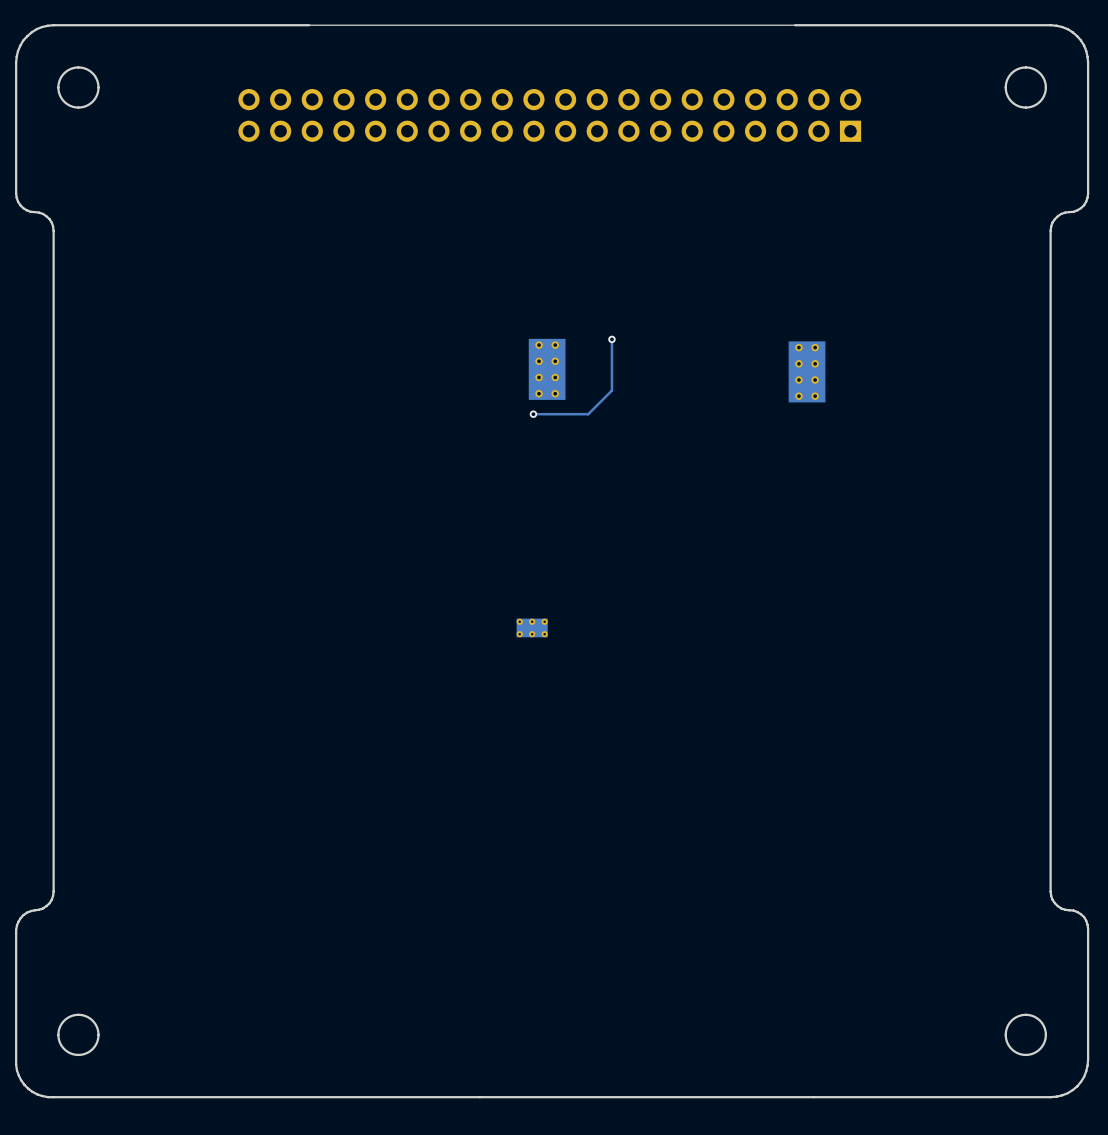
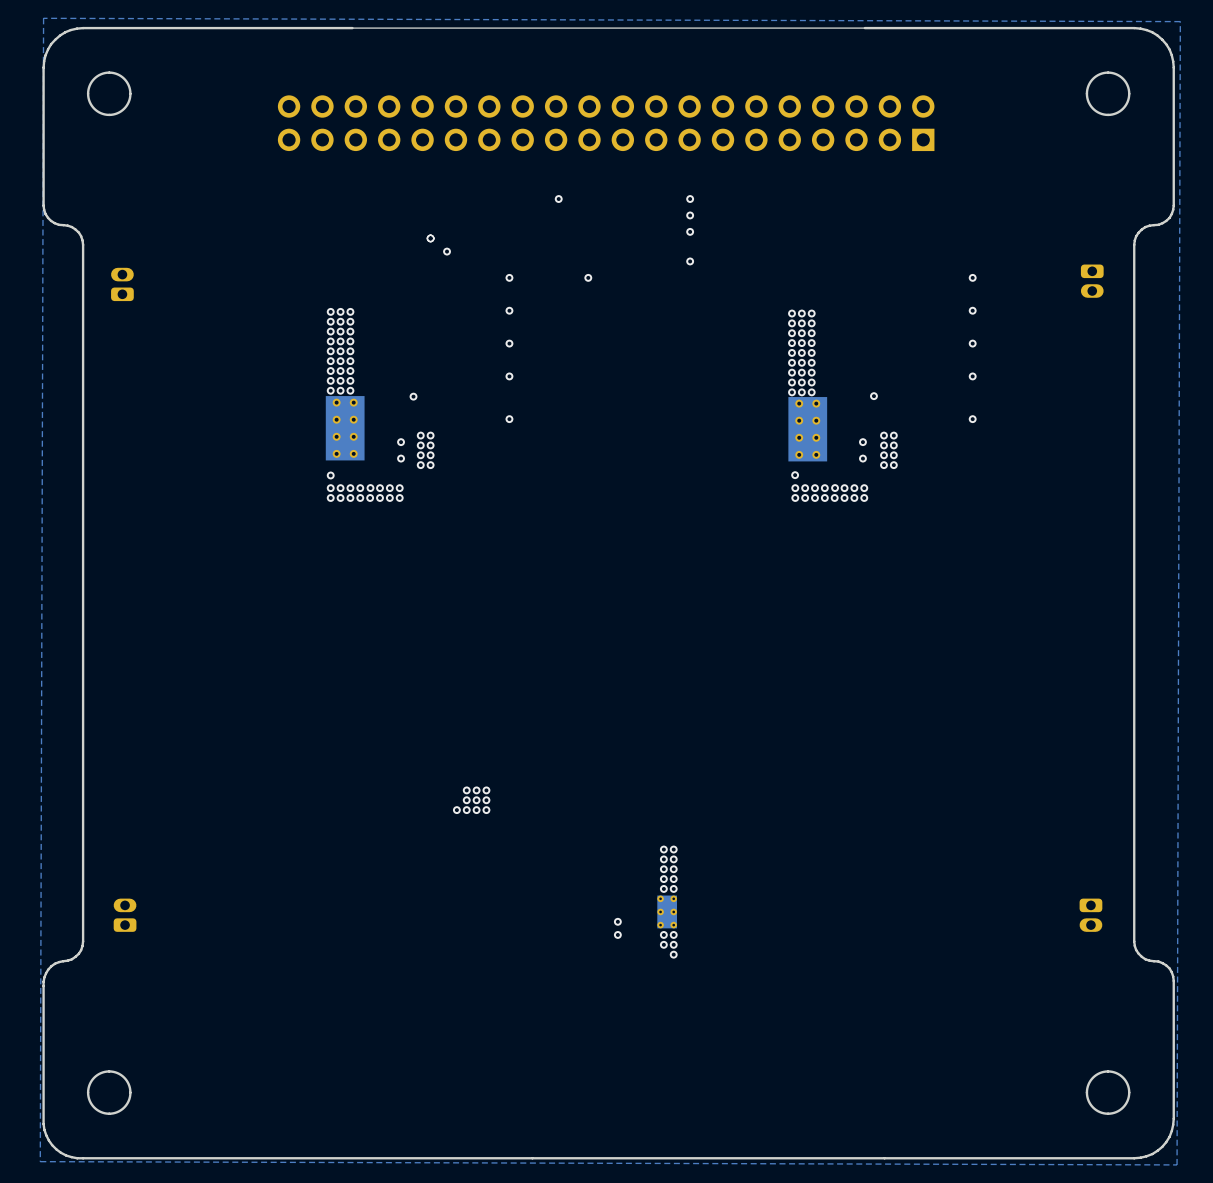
zone outline: none -> (43, 18) (1180, 21) (1177, 1164) (40, 1161) (43, 18)
via: none -> (558, 199)
via: none -> (690, 199)
via: none -> (690, 215)
via: none -> (690, 231)
via: none -> (430, 238)
via: none -> (447, 251)
via: none -> (690, 261)
via: none -> (509, 277)
via: none -> (588, 277)
via: none -> (972, 277)
part: none -> (1092, 281)
part: none -> (122, 284)
via: none -> (509, 310)
via: none -> (972, 310)
via: none -> (330, 311)
via: none -> (340, 311)
via: none -> (350, 311)
via: none -> (791, 313)
via: none -> (801, 313)
via: none -> (811, 313)
via: none -> (330, 321)
via: none -> (340, 321)
via: none -> (350, 321)
via: none -> (791, 323)
via: none -> (801, 323)
via: none -> (811, 323)
via: none -> (330, 331)
via: none -> (340, 331)
via: none -> (350, 331)
via: none -> (791, 333)
via: none -> (801, 333)
via: none -> (811, 333)
via: none -> (330, 341)
via: none -> (340, 341)
via: none -> (350, 341)
via: none -> (791, 343)
via: none -> (801, 343)
via: none -> (811, 343)
via: none -> (509, 343)
via: none -> (972, 343)
via: none -> (330, 351)
via: none -> (340, 351)
via: none -> (350, 351)
via: none -> (791, 352)
via: none -> (801, 352)
via: none -> (811, 352)
track: (611, 339) (611, 390) (588, 414) (533, 414) -> none
via: (611, 339) -> none
via: none -> (330, 361)
via: none -> (340, 361)
via: none -> (350, 361)
via: none -> (791, 362)
via: none -> (801, 362)
via: none -> (811, 362)
via: none -> (330, 371)
via: none -> (340, 371)
via: none -> (350, 371)
via: none -> (791, 372)
via: none -> (801, 372)
via: none -> (811, 372)
via: none -> (509, 376)
via: none -> (972, 376)
via: none -> (330, 380)
via: none -> (340, 380)
via: none -> (350, 380)
via: none -> (791, 382)
via: none -> (801, 382)
via: none -> (811, 382)
via: none -> (330, 390)
via: none -> (340, 390)
via: none -> (350, 390)
part: (547, 369) -> none
via: none -> (791, 392)
via: none -> (801, 392)
via: none -> (811, 392)
part position: (807, 371) -> (807, 429)
via: none -> (413, 396)
via: none -> (873, 396)
via: none -> (509, 419)
via: none -> (972, 419)
part: none -> (345, 428)
via: none -> (420, 435)
via: none -> (430, 435)
via: none -> (883, 435)
via: none -> (893, 435)
via: (533, 414) -> none
via: none -> (401, 442)
via: none -> (862, 442)
via: none -> (420, 445)
via: none -> (430, 445)
via: none -> (883, 445)
via: none -> (893, 445)
via: none -> (420, 455)
via: none -> (430, 455)
via: none -> (883, 455)
via: none -> (893, 455)
via: none -> (401, 458)
via: none -> (862, 458)
via: none -> (420, 465)
via: none -> (430, 465)
via: none -> (883, 465)
via: none -> (893, 465)
via: none -> (330, 475)
via: none -> (795, 475)
via: none -> (330, 488)
via: none -> (340, 488)
via: none -> (350, 488)
via: none -> (360, 488)
via: none -> (370, 488)
via: none -> (380, 488)
via: none -> (389, 488)
via: none -> (399, 488)
via: none -> (795, 488)
via: none -> (805, 488)
via: none -> (814, 488)
via: none -> (824, 488)
via: none -> (835, 488)
via: none -> (844, 488)
via: none -> (854, 488)
via: none -> (864, 488)
via: none -> (330, 497)
via: none -> (340, 497)
via: none -> (350, 497)
via: none -> (360, 497)
via: none -> (370, 497)
via: none -> (380, 497)
via: none -> (389, 497)
via: none -> (399, 497)
via: none -> (795, 497)
via: none -> (805, 497)
via: none -> (814, 497)
via: none -> (824, 497)
via: none -> (834, 497)
via: none -> (844, 497)
via: none -> (854, 497)
via: none -> (864, 497)
part rotation: 0° (532, 627) -> 90° clockwise (667, 911)
part position: (532, 627) -> (667, 911)
via: none -> (466, 790)
via: none -> (476, 790)
via: none -> (486, 790)
via: none -> (466, 800)
via: none -> (476, 800)
via: none -> (486, 800)
via: none -> (456, 810)
via: none -> (466, 810)
via: none -> (476, 810)
via: none -> (486, 810)
via: none -> (663, 849)
via: none -> (673, 849)
via: none -> (663, 859)
via: none -> (673, 859)
via: none -> (663, 869)
via: none -> (673, 869)
via: none -> (663, 879)
via: none -> (673, 879)
via: none -> (663, 888)
via: none -> (673, 888)
part: none -> (125, 915)
part: none -> (1090, 915)
via: none -> (617, 921)
via: none -> (617, 934)
via: none -> (663, 934)
via: none -> (673, 934)
via: none -> (663, 944)
via: none -> (673, 944)
via: none -> (673, 954)

